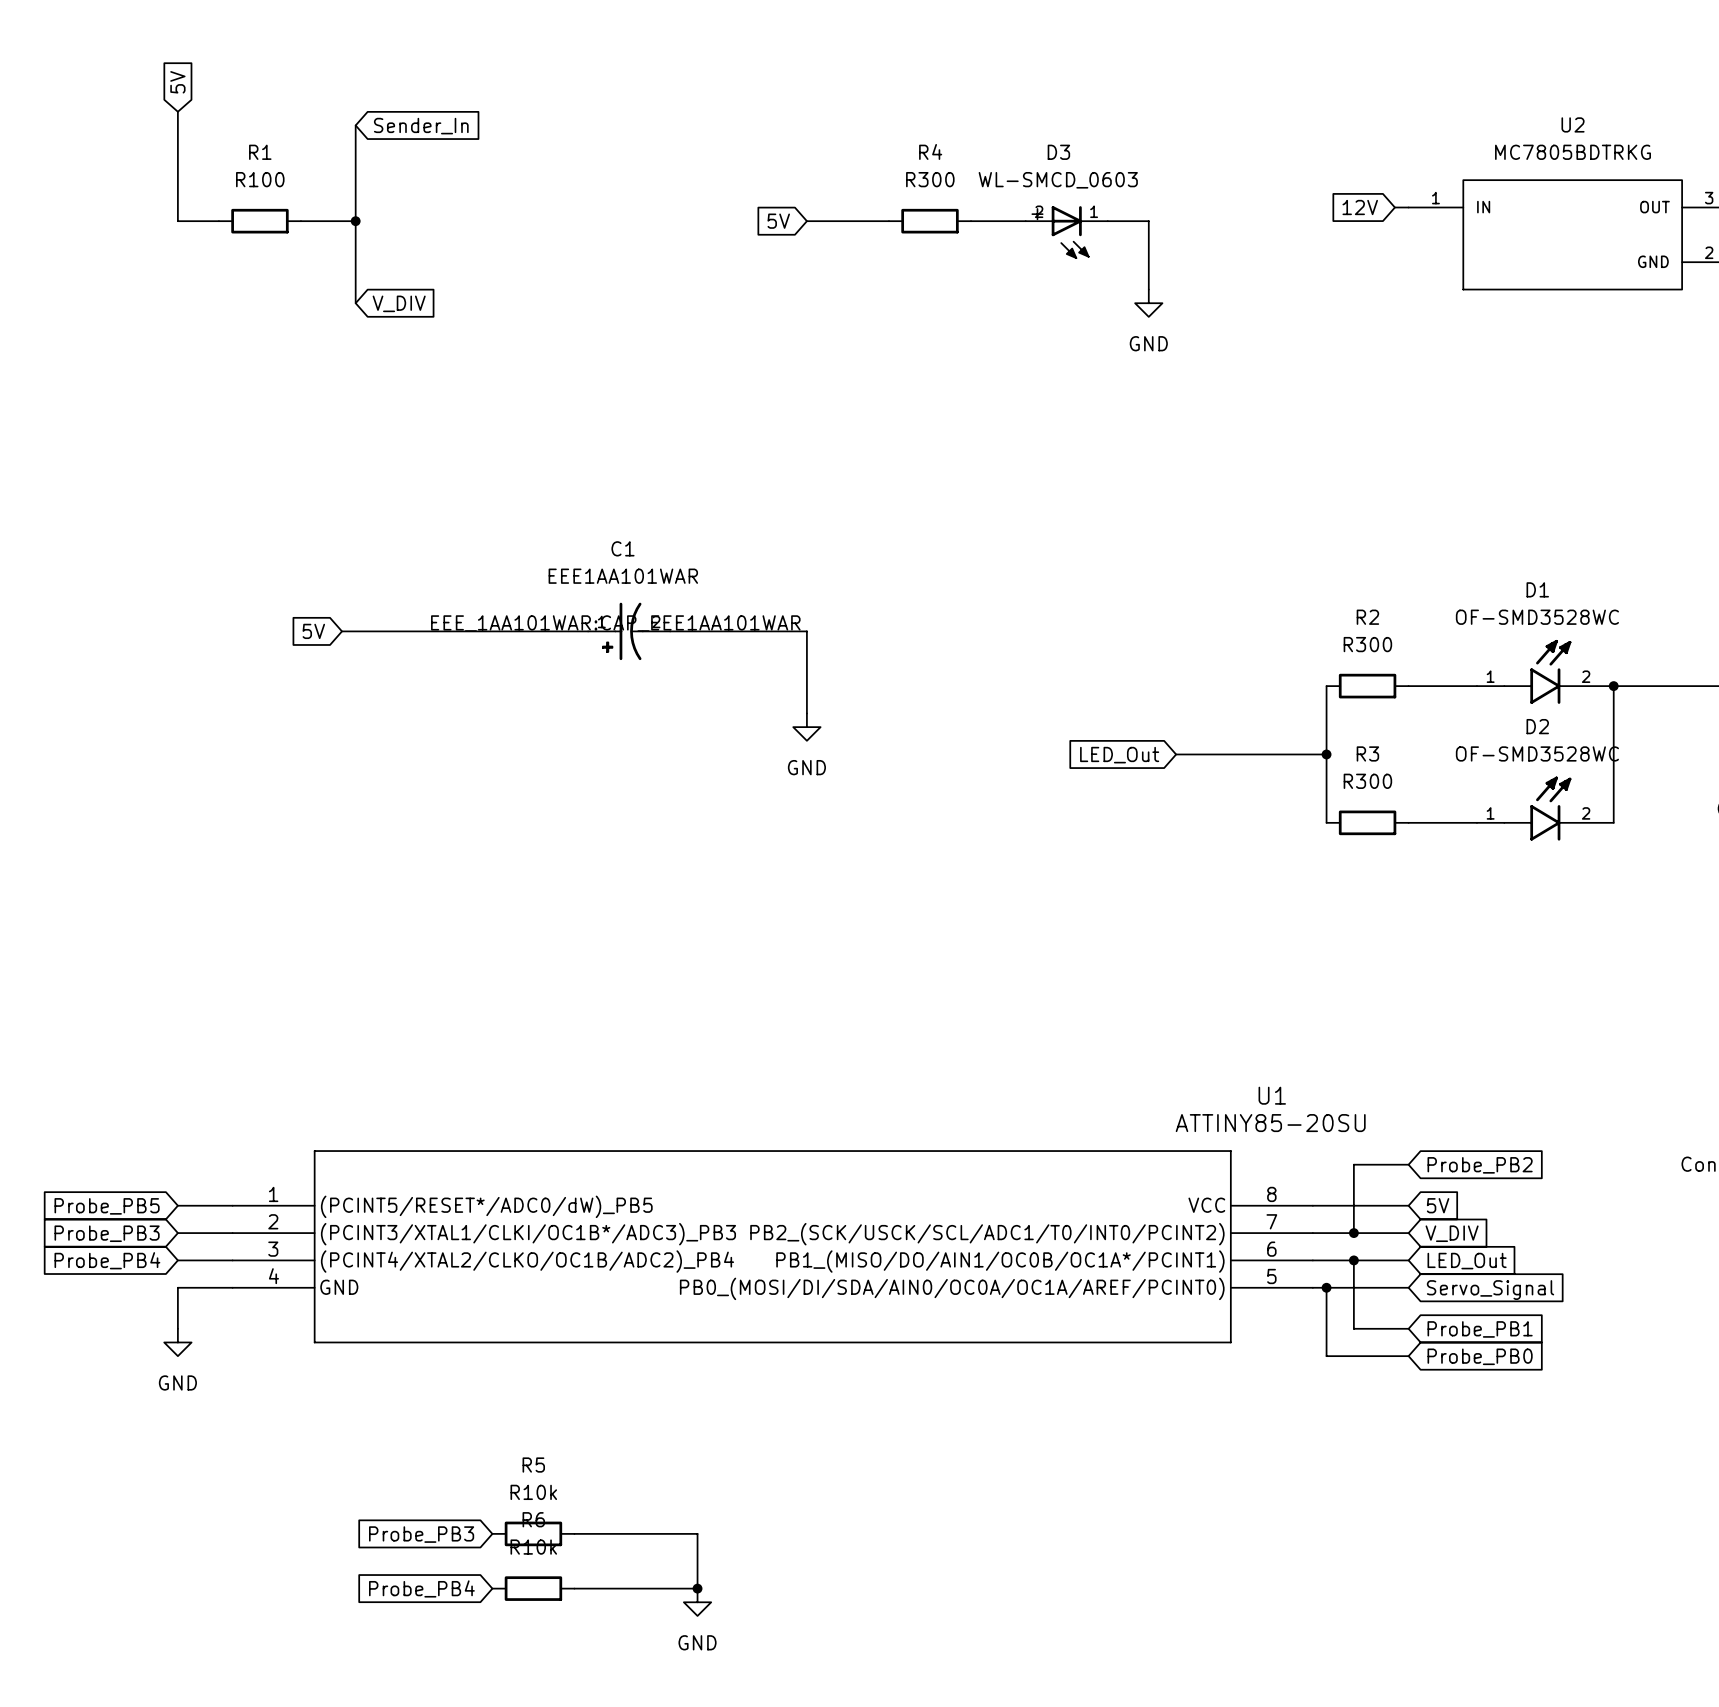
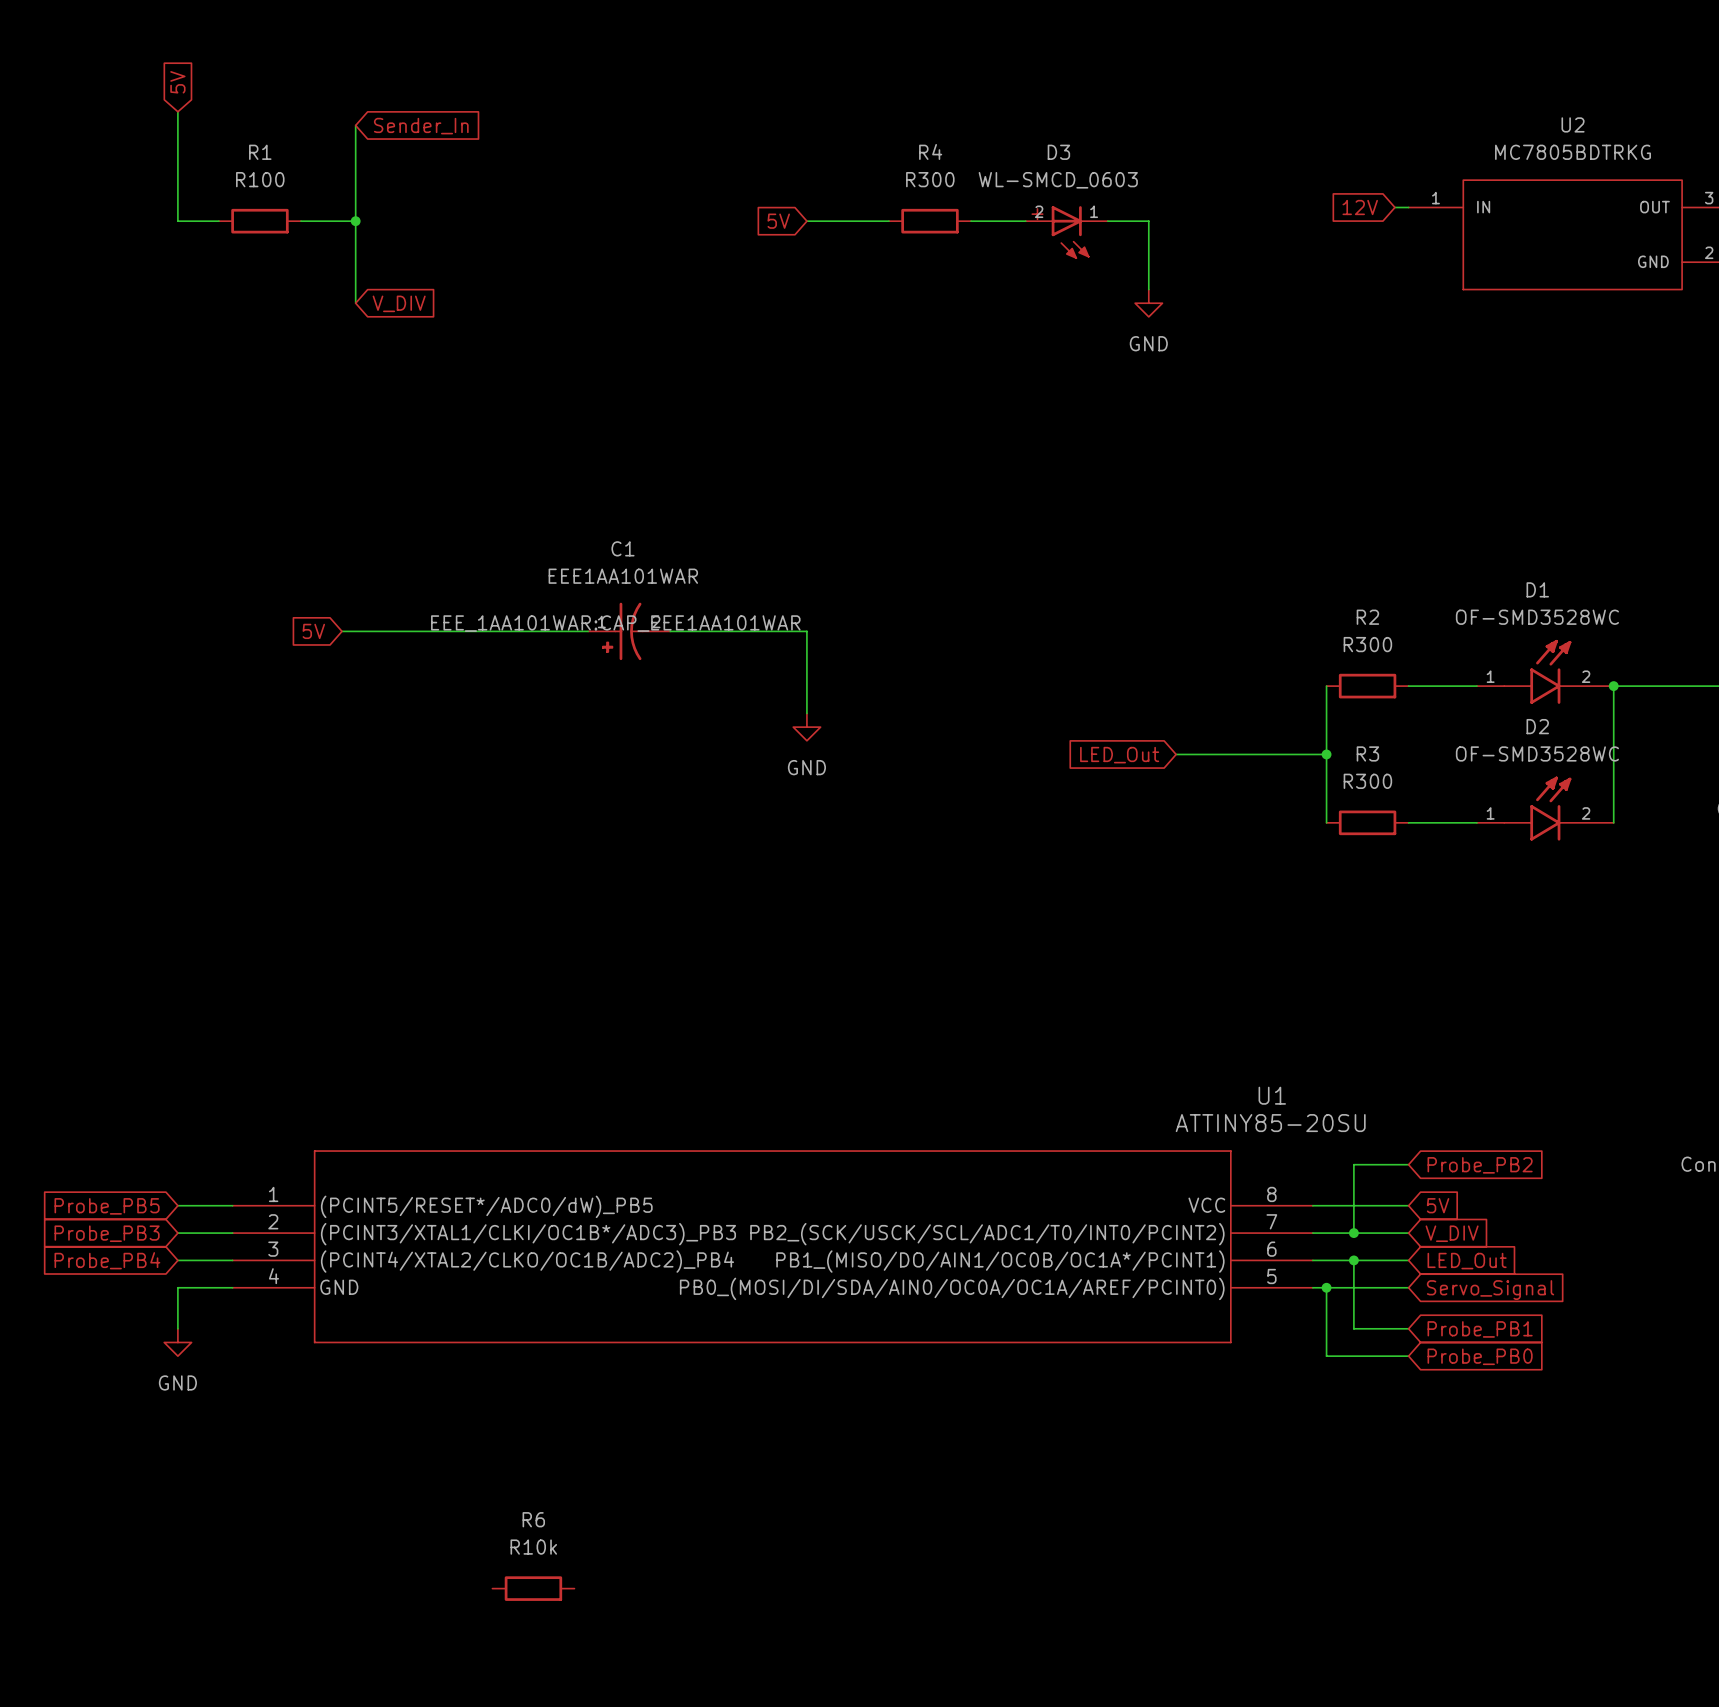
R5: R10k (533, 1533) -> none
wire: (574, 1533) (697, 1533) (697, 1588) (574, 1588) -> none
global label: Probe_PB3 (421, 1534) -> none
global label: Probe_PB4 (421, 1588) -> none
junction: (697, 1588) -> none
power symbol: GND (697, 1602) -> none

